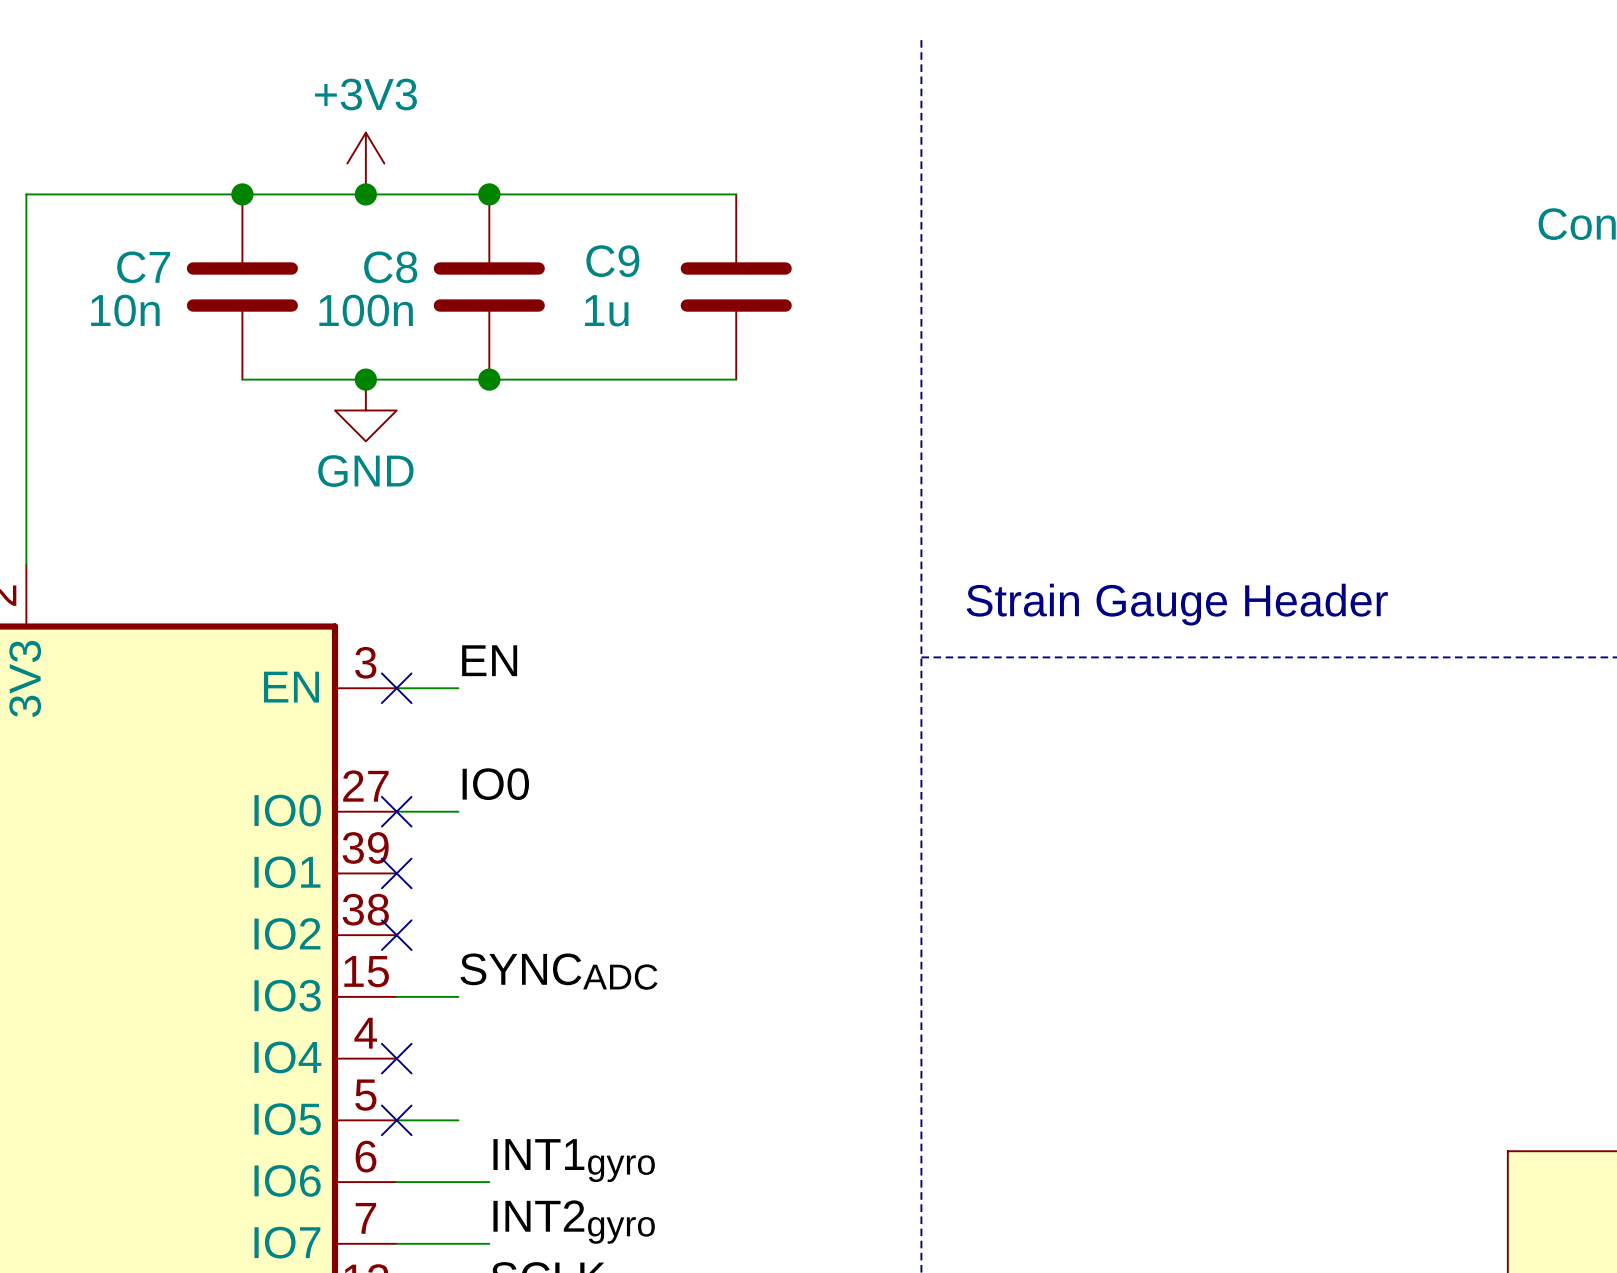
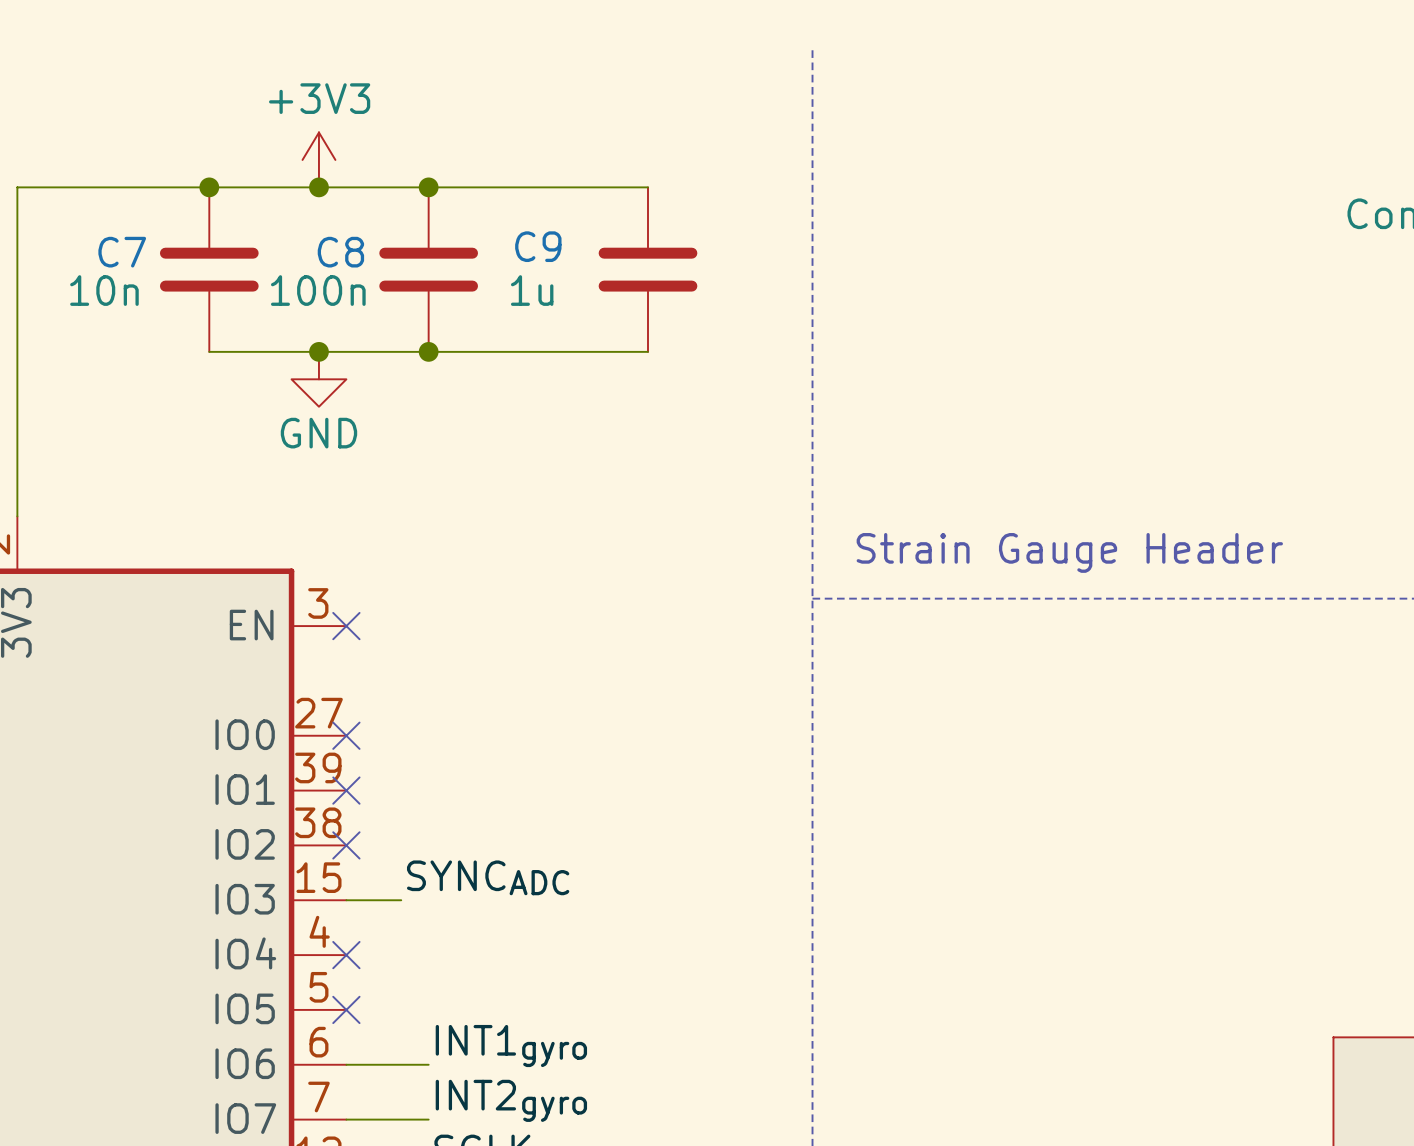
label: EN (489, 660) -> none
wire: (396, 688) (458, 688) -> none
label: IO0 (495, 784) -> none
wire: (396, 811) (458, 811) -> none
wire: (396, 1120) (458, 1120) -> none

